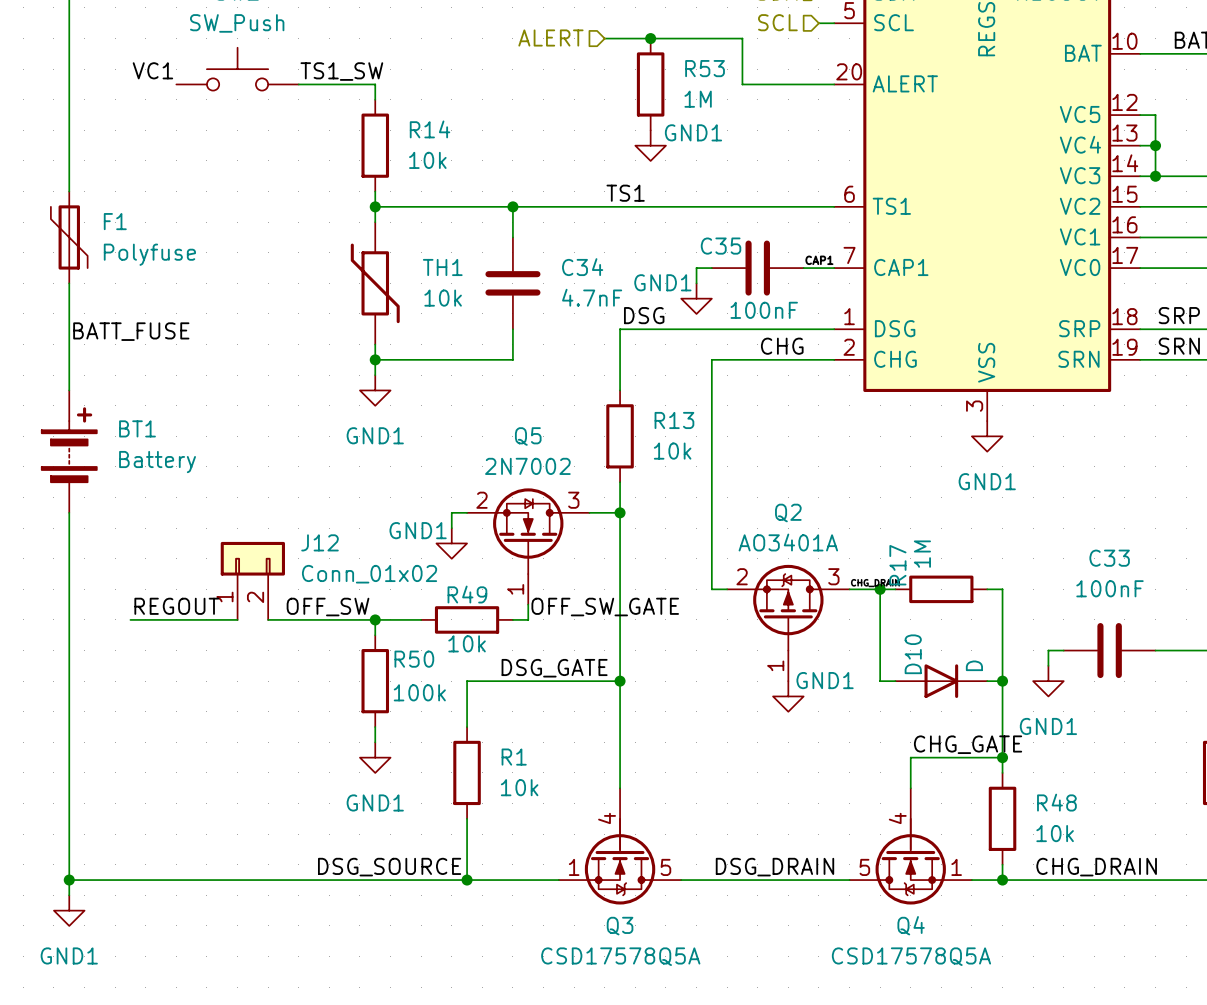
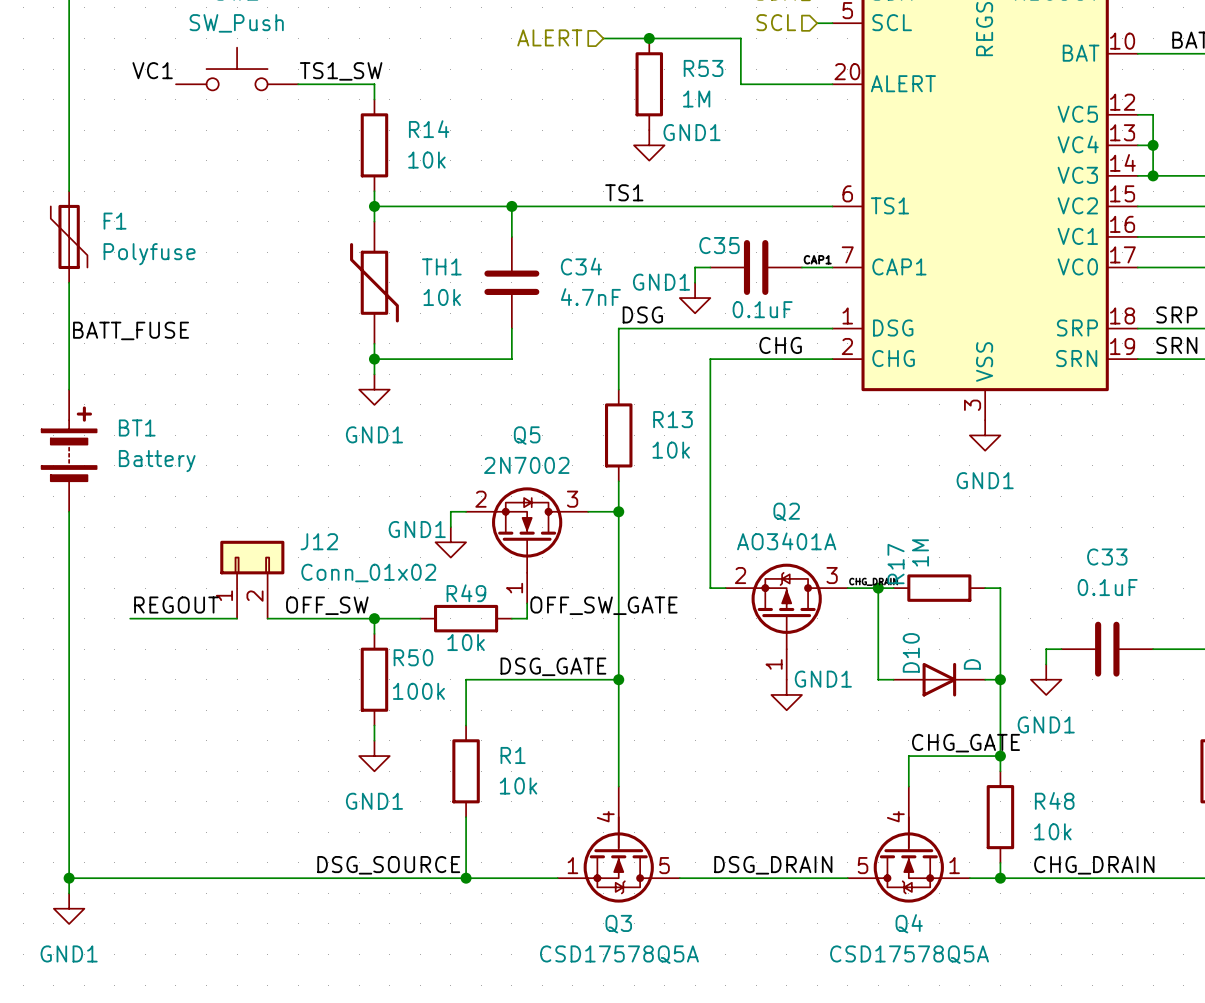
C35 value: 100nF (764, 310) -> 0.1uF (762, 309)
C33 value: 100nF (1109, 588) -> 0.1uF (1107, 587)

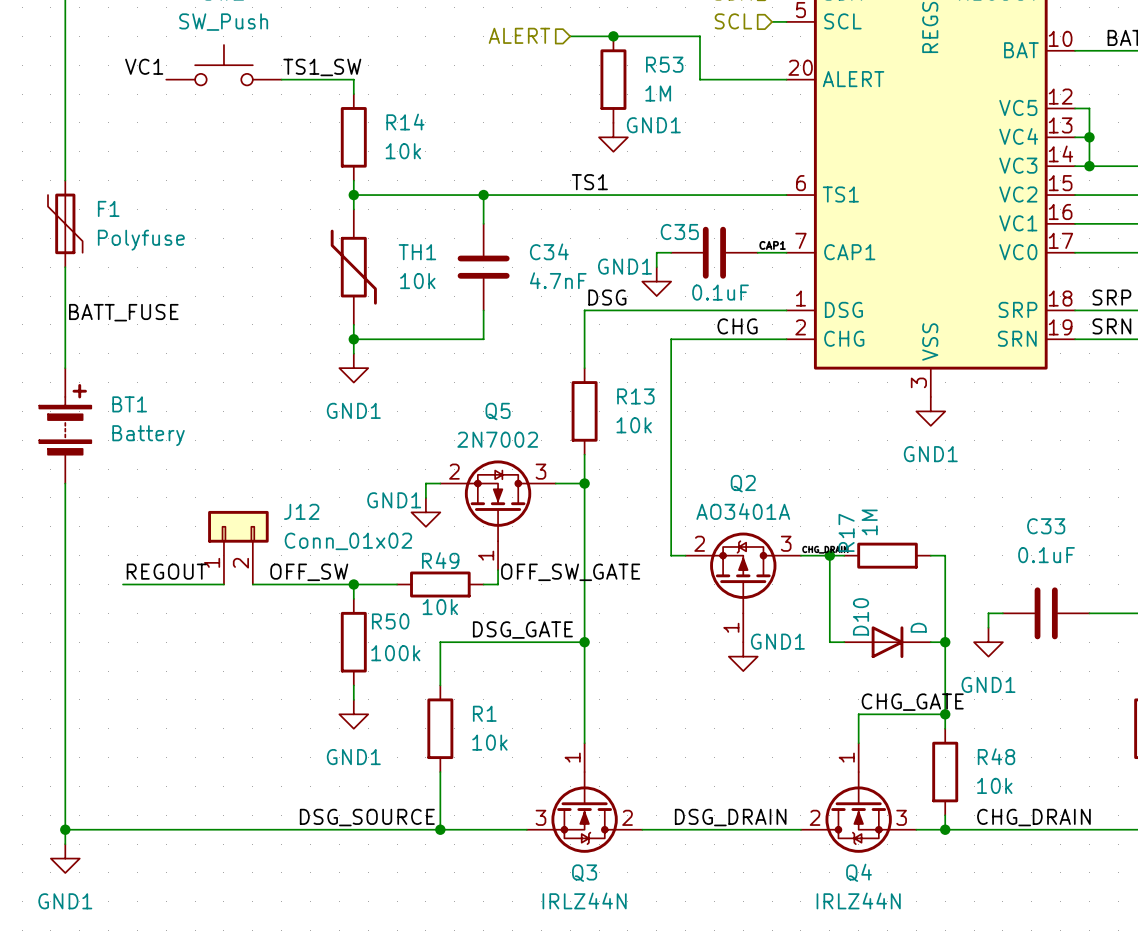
Q3 symbol: [557, 786, 680, 903] -> [526, 743, 643, 853]
Q4 symbol: [847, 786, 970, 903] -> [800, 743, 917, 853]
Q3 value: CSD17578Q5A (619, 954) -> IRLZ44N (584, 900)
Q4 value: CSD17578Q5A (909, 954) -> IRLZ44N (858, 900)

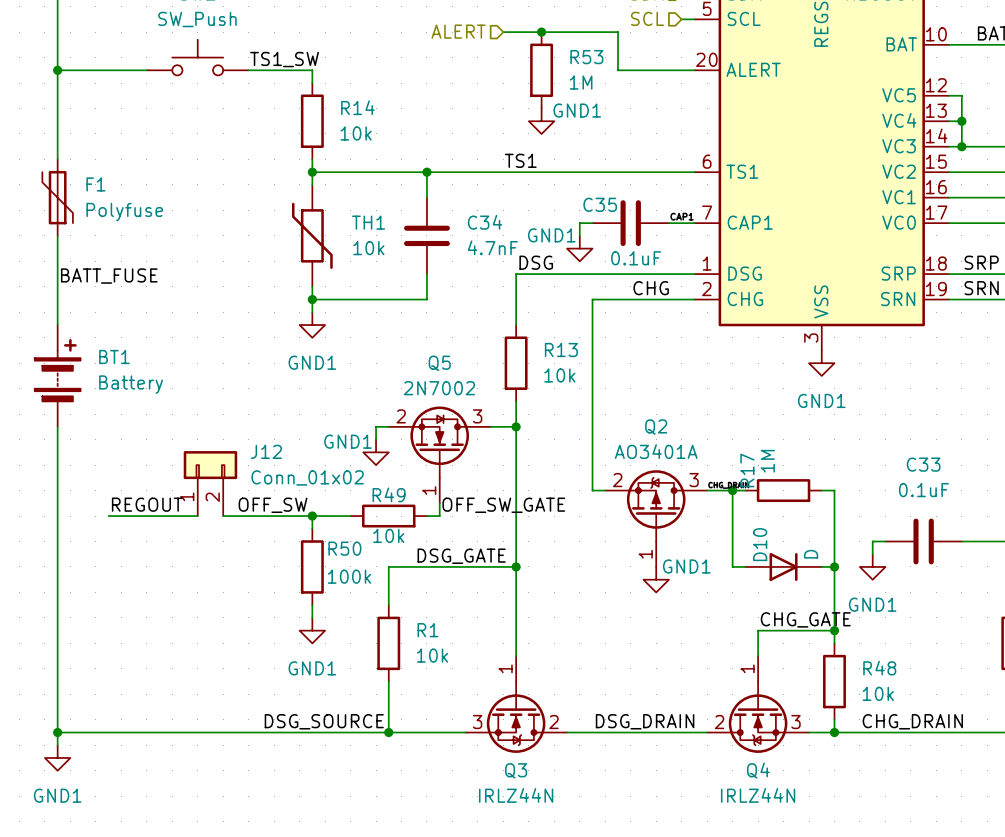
label: VC1 (144, 66) -> none
wire: none -> (57, 70) (146, 70)
junction: none -> (57, 70)

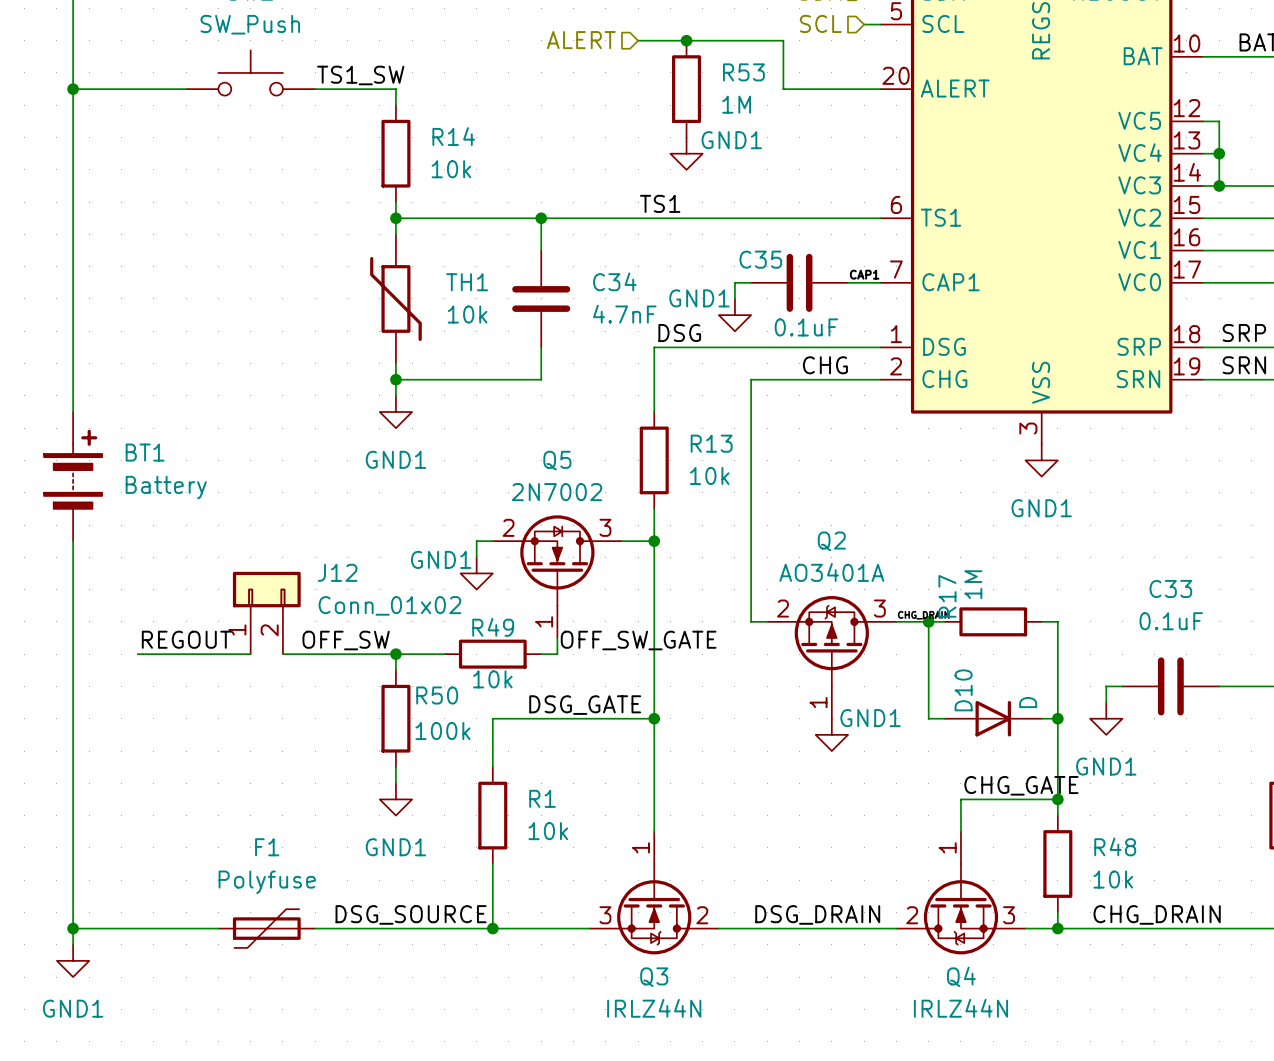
F1 name position: F1 (95, 184) -> F1 (267, 847)
F1 rotation: 0° (57, 197) -> 90° clockwise (266, 928)
F1 position: (57, 197) -> (266, 928)
F1 value position: Polyfuse (124, 212) -> Polyfuse (267, 882)
label: BATT_FUSE (109, 276) -> none

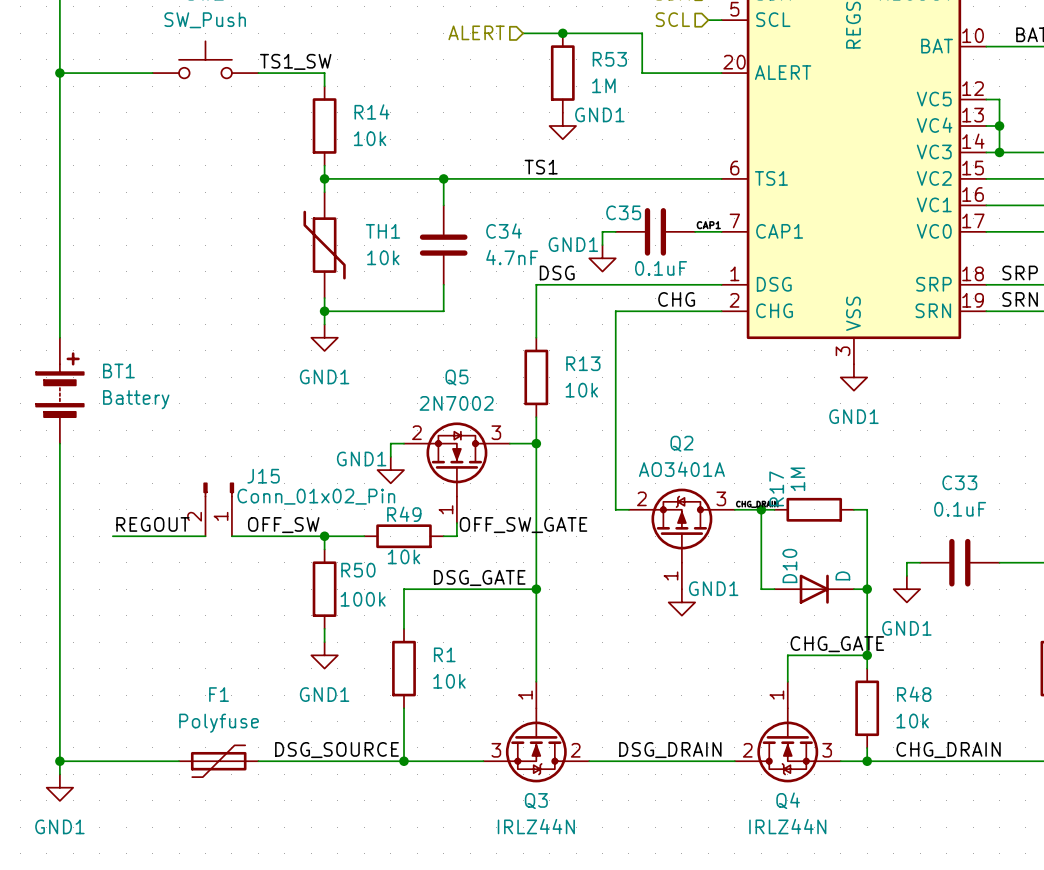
J12: Conn_01x02 (266, 612) -> none
J15: none -> Conn_01x02_Pin (218, 509)

